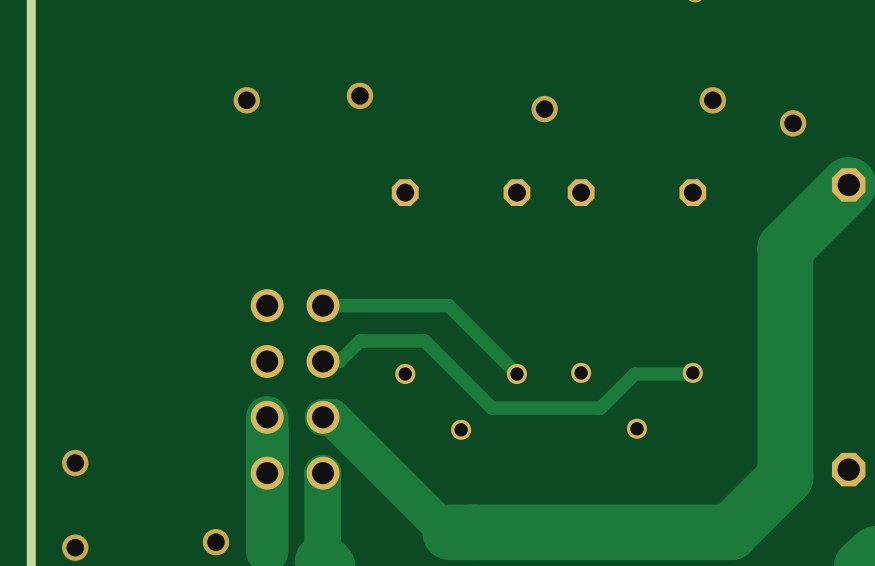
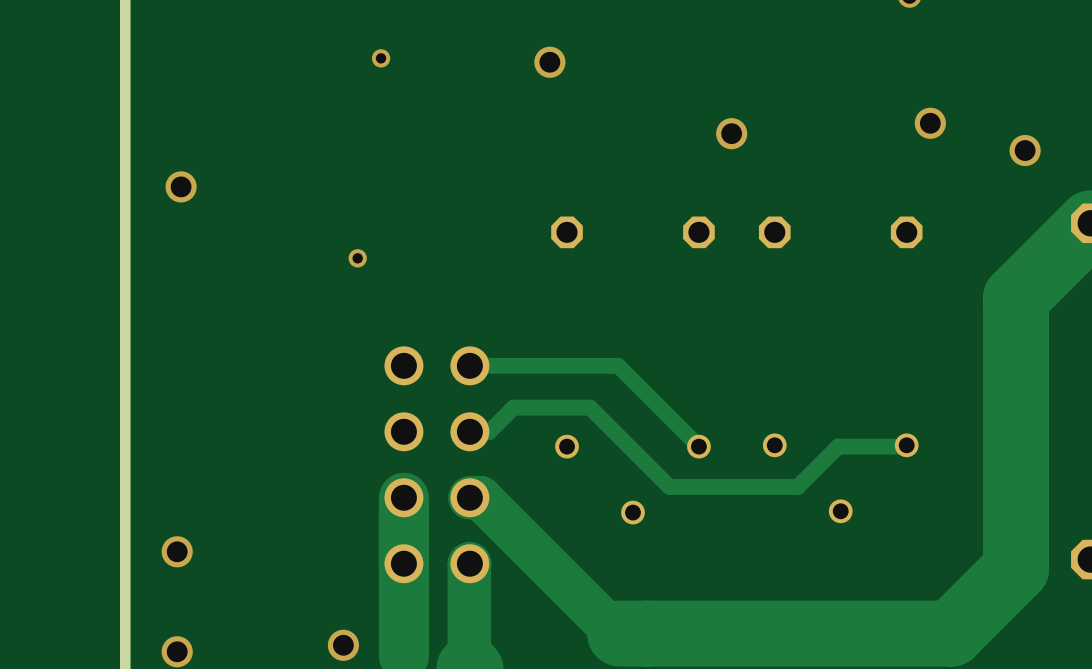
via: none -> (381, 58)
via position: (359, 95) -> (549, 62)
via: (246, 100) -> none
via: none -> (181, 186)
via: none -> (357, 258)

